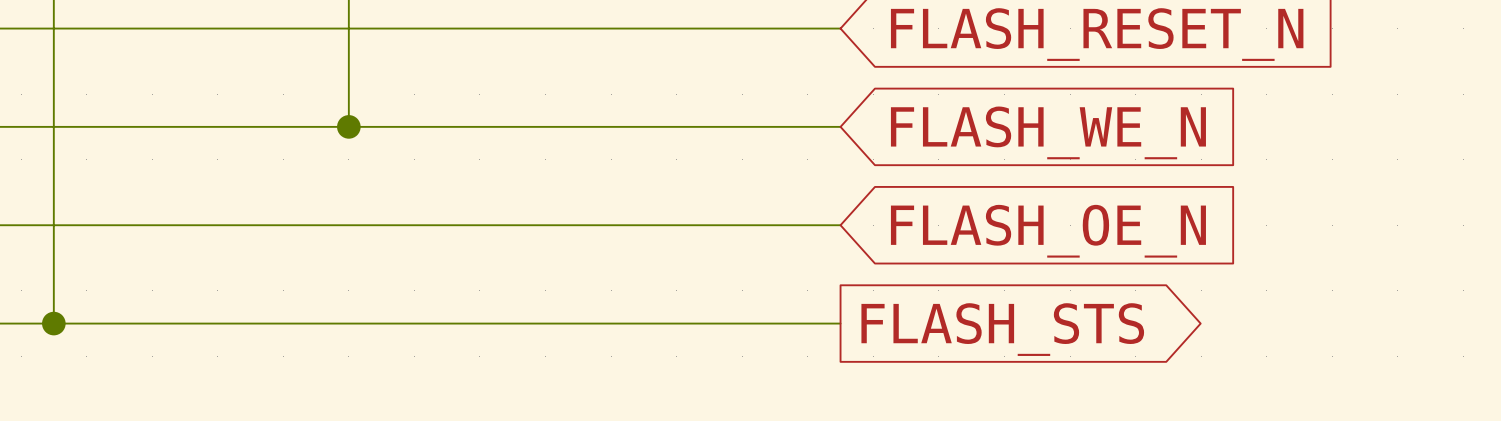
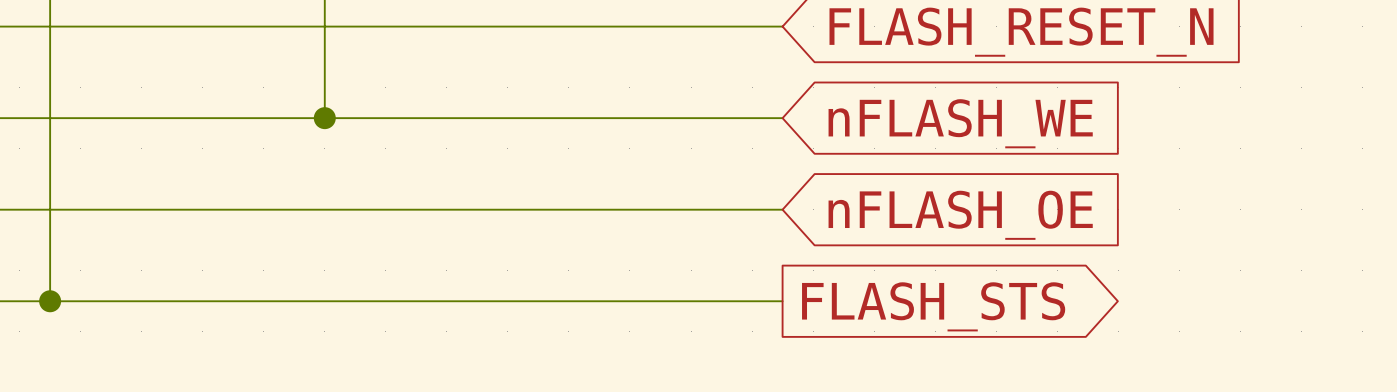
global label: FLASH_WE_N (1048, 132) -> nFLASH_WE (960, 123)
global label: FLASH_OE_N (1048, 231) -> nFLASH_OE (960, 215)

